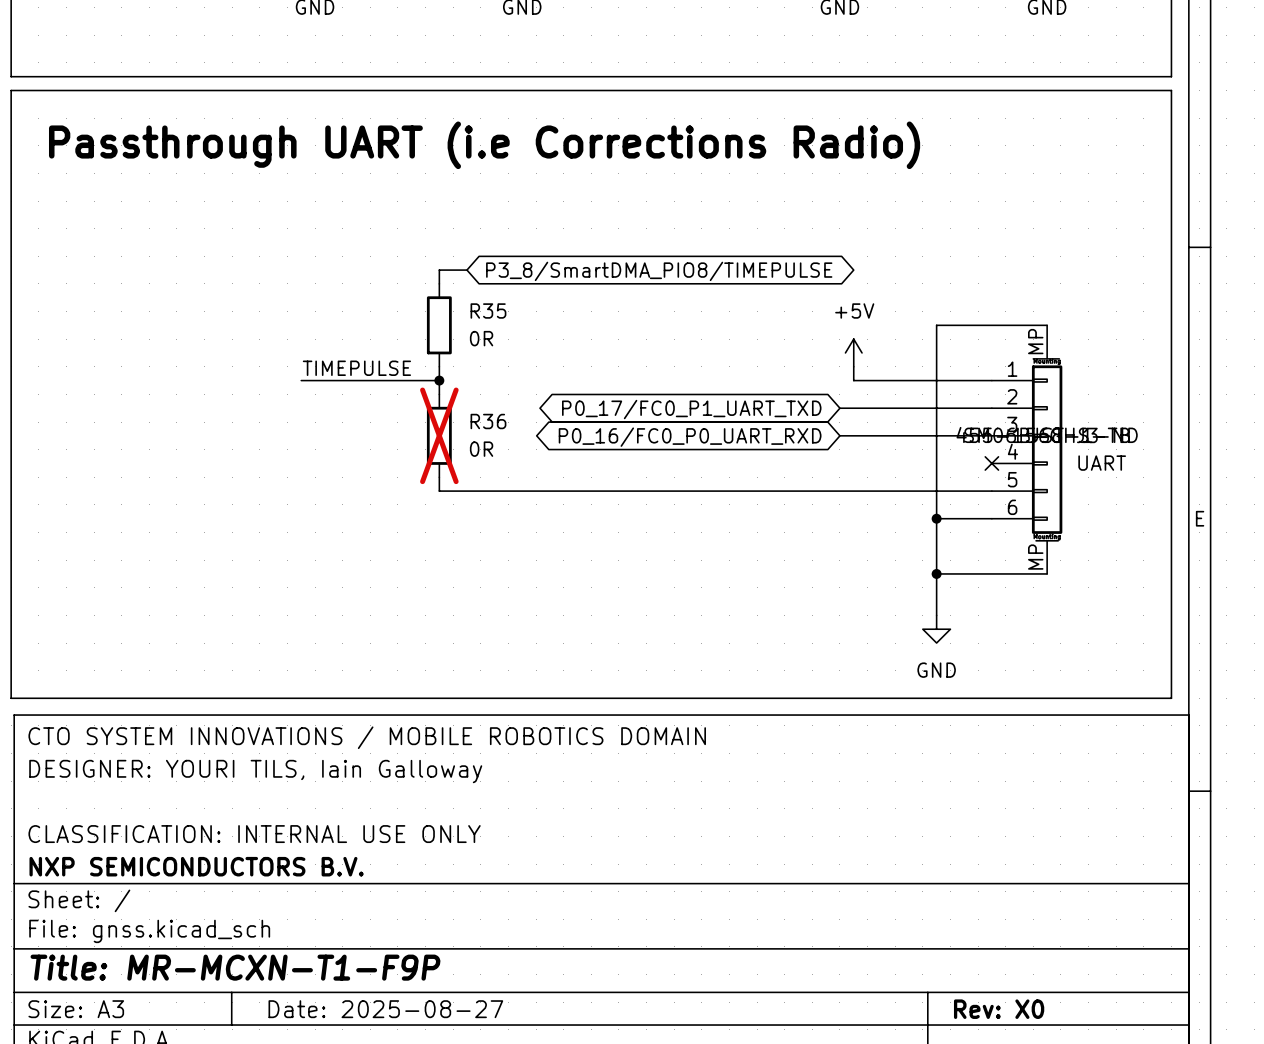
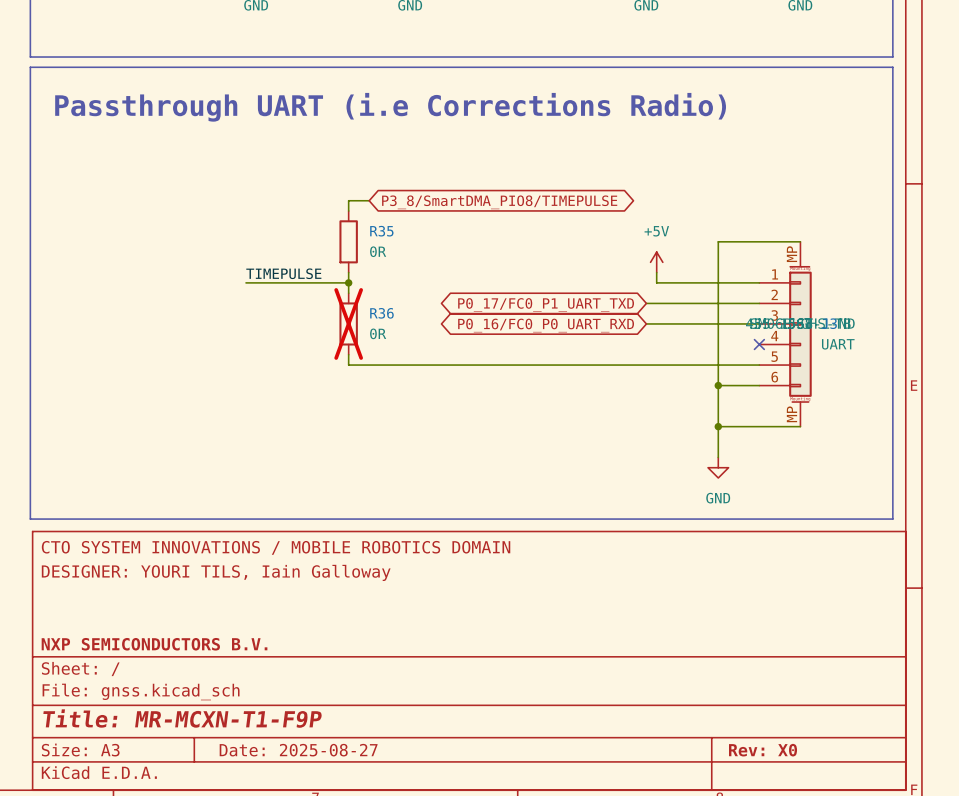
title block: CLASSIFICATION: INTERNAL USE ONLY (254, 834) -> none

